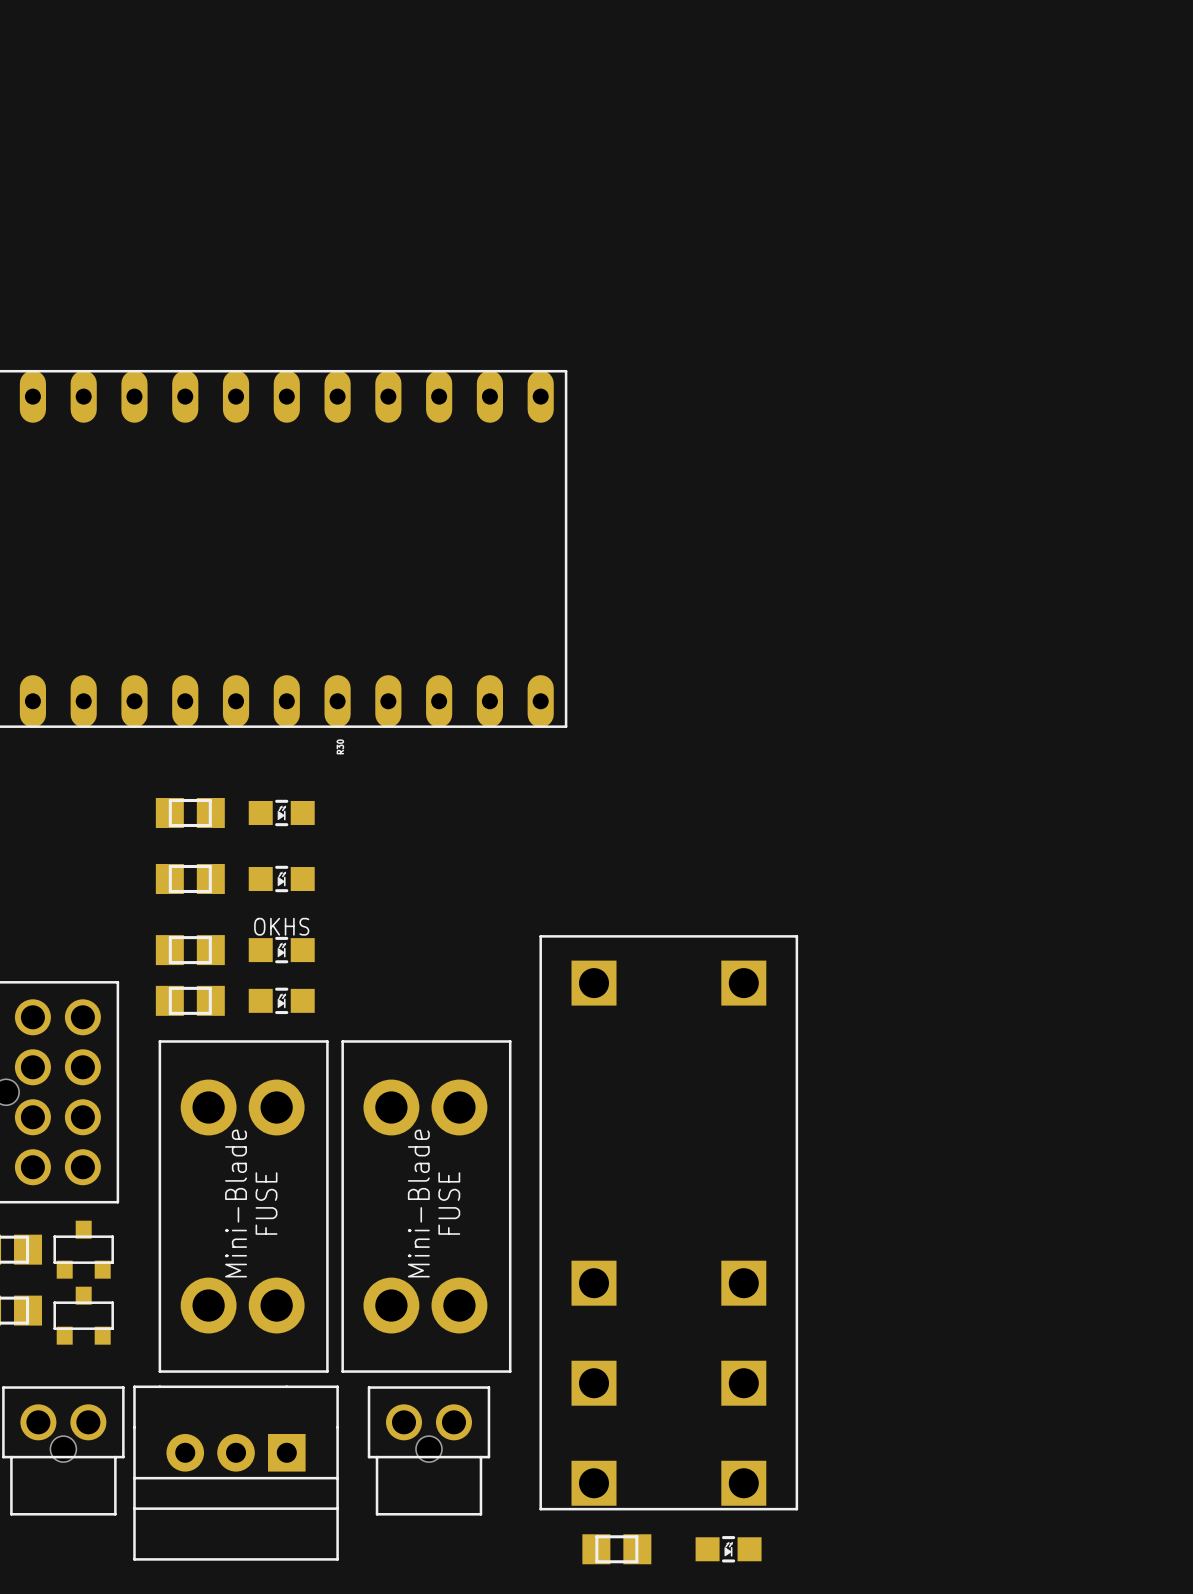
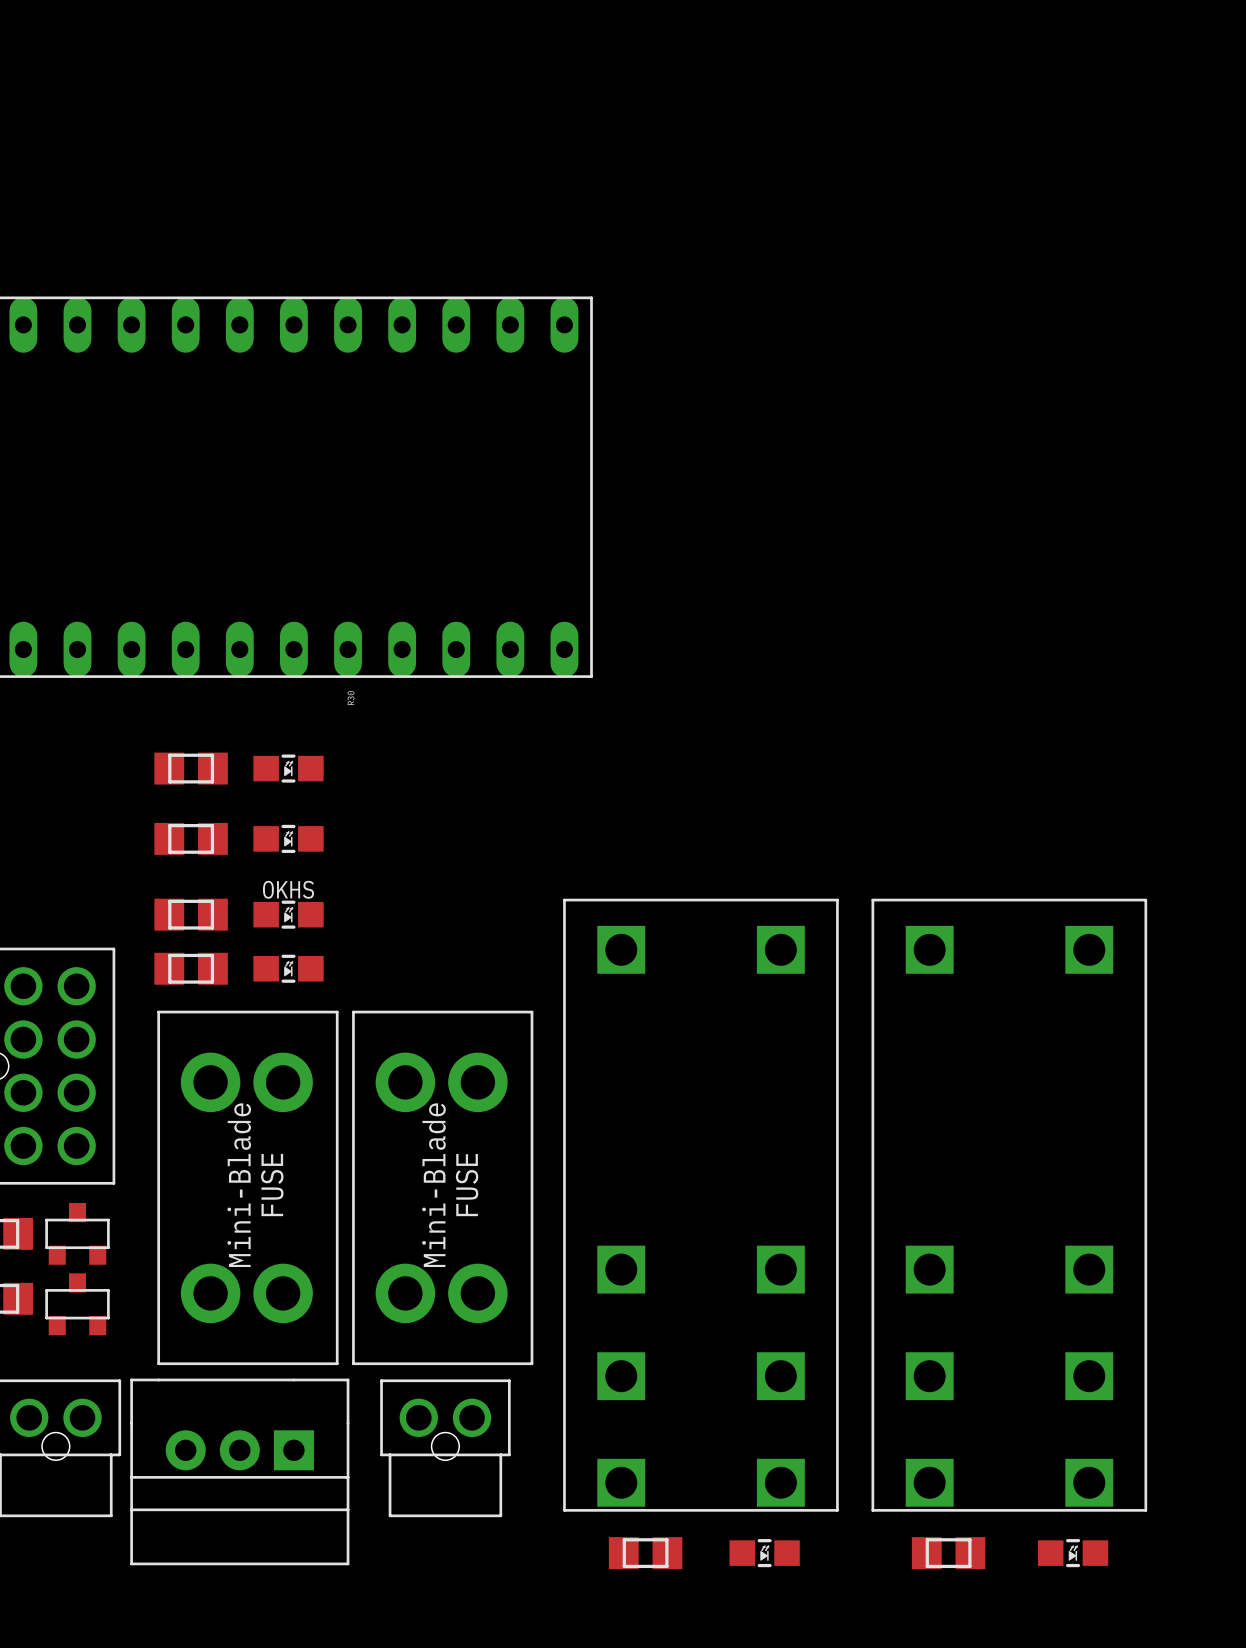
part: none -> (1009, 1205)
part: none -> (948, 1553)
part: none -> (1073, 1553)

